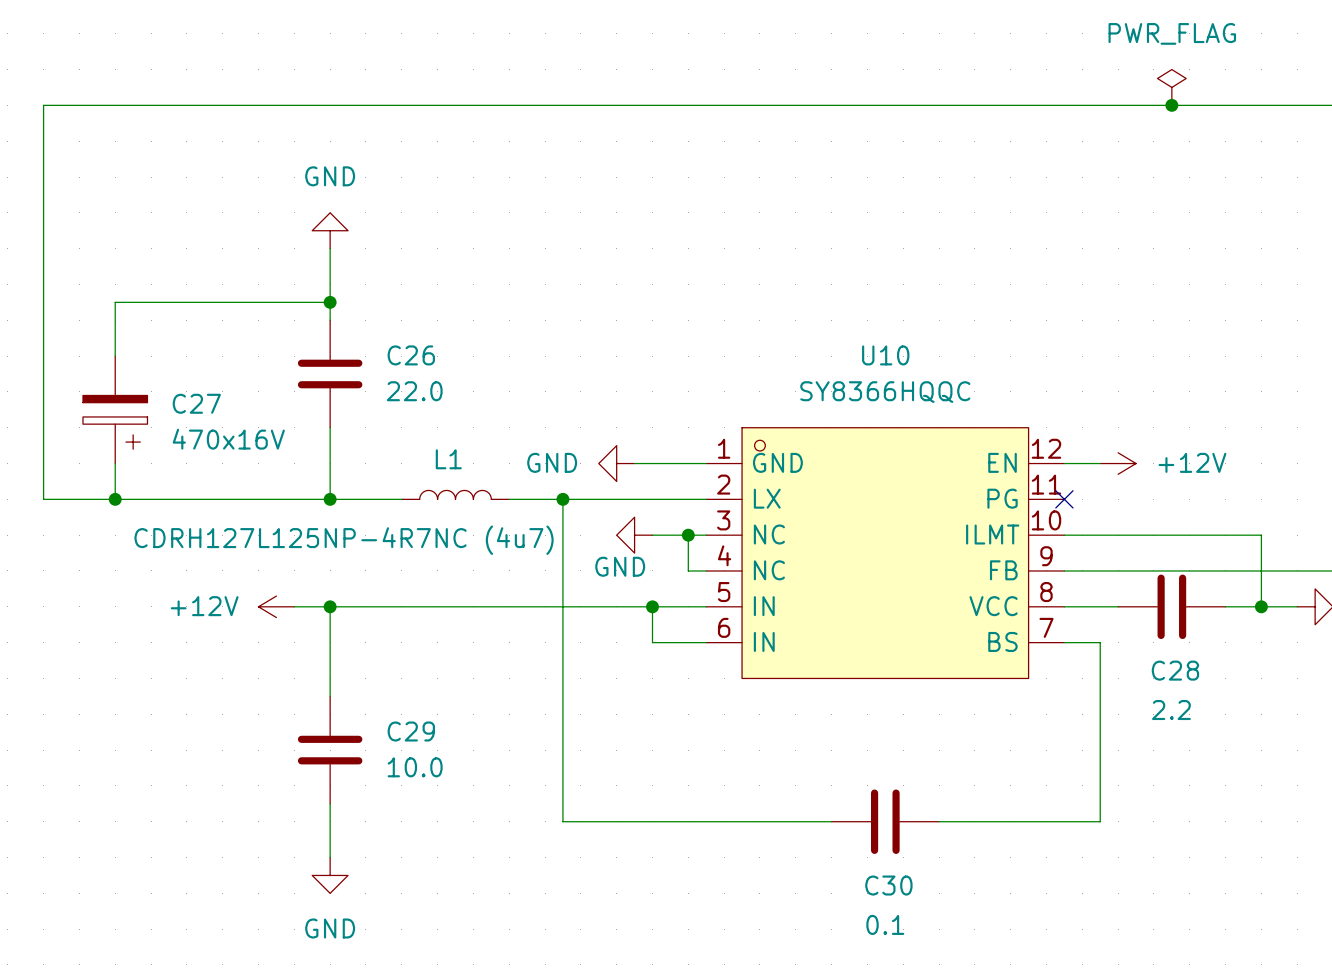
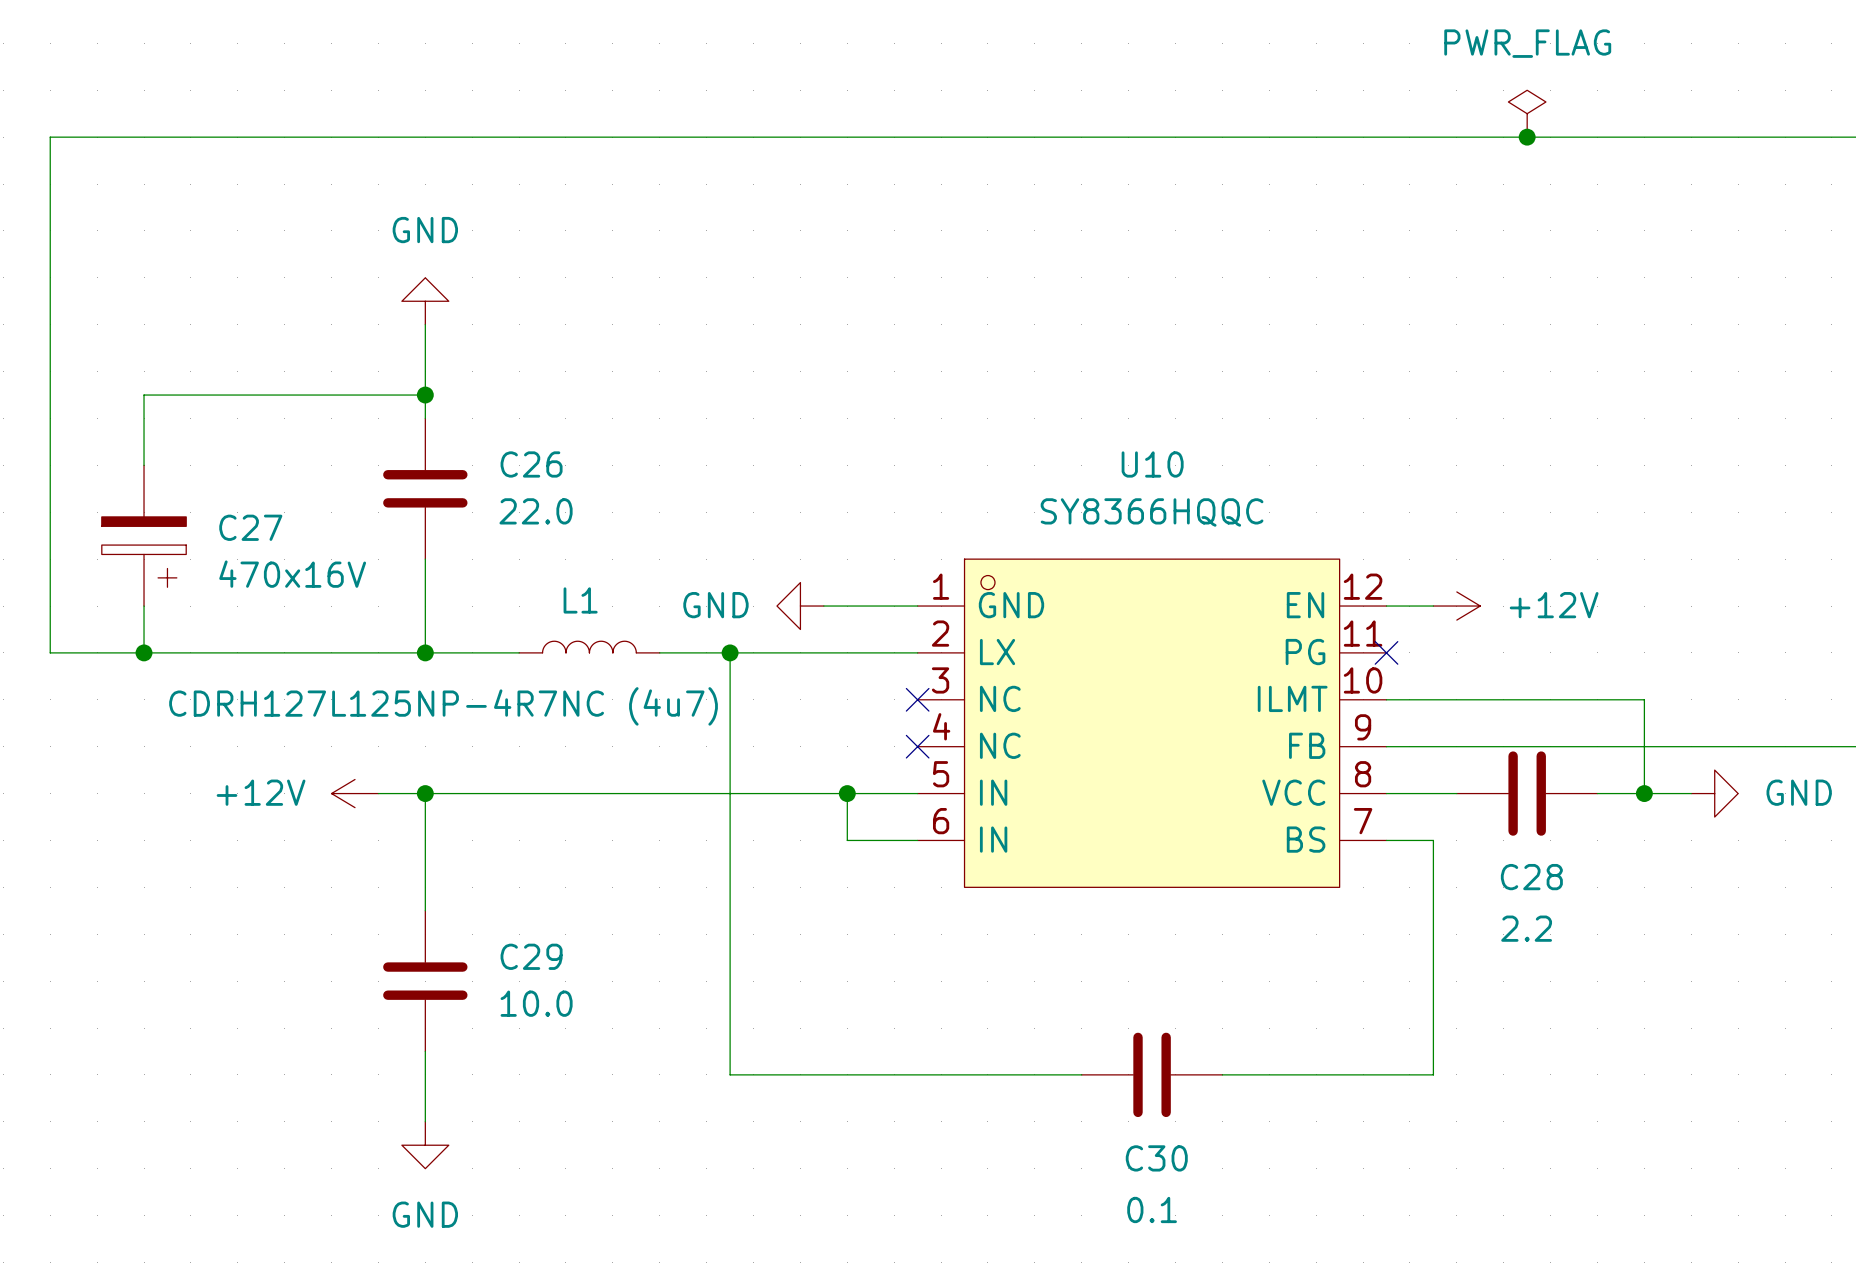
power symbol: GND (634, 535) -> none
wire: (652, 535) (706, 535) -> none
wire: (688, 535) (688, 570) (706, 570) -> none
junction: (688, 535) -> none
no-connect mark: none -> (917, 699)
no-connect mark: none -> (917, 746)

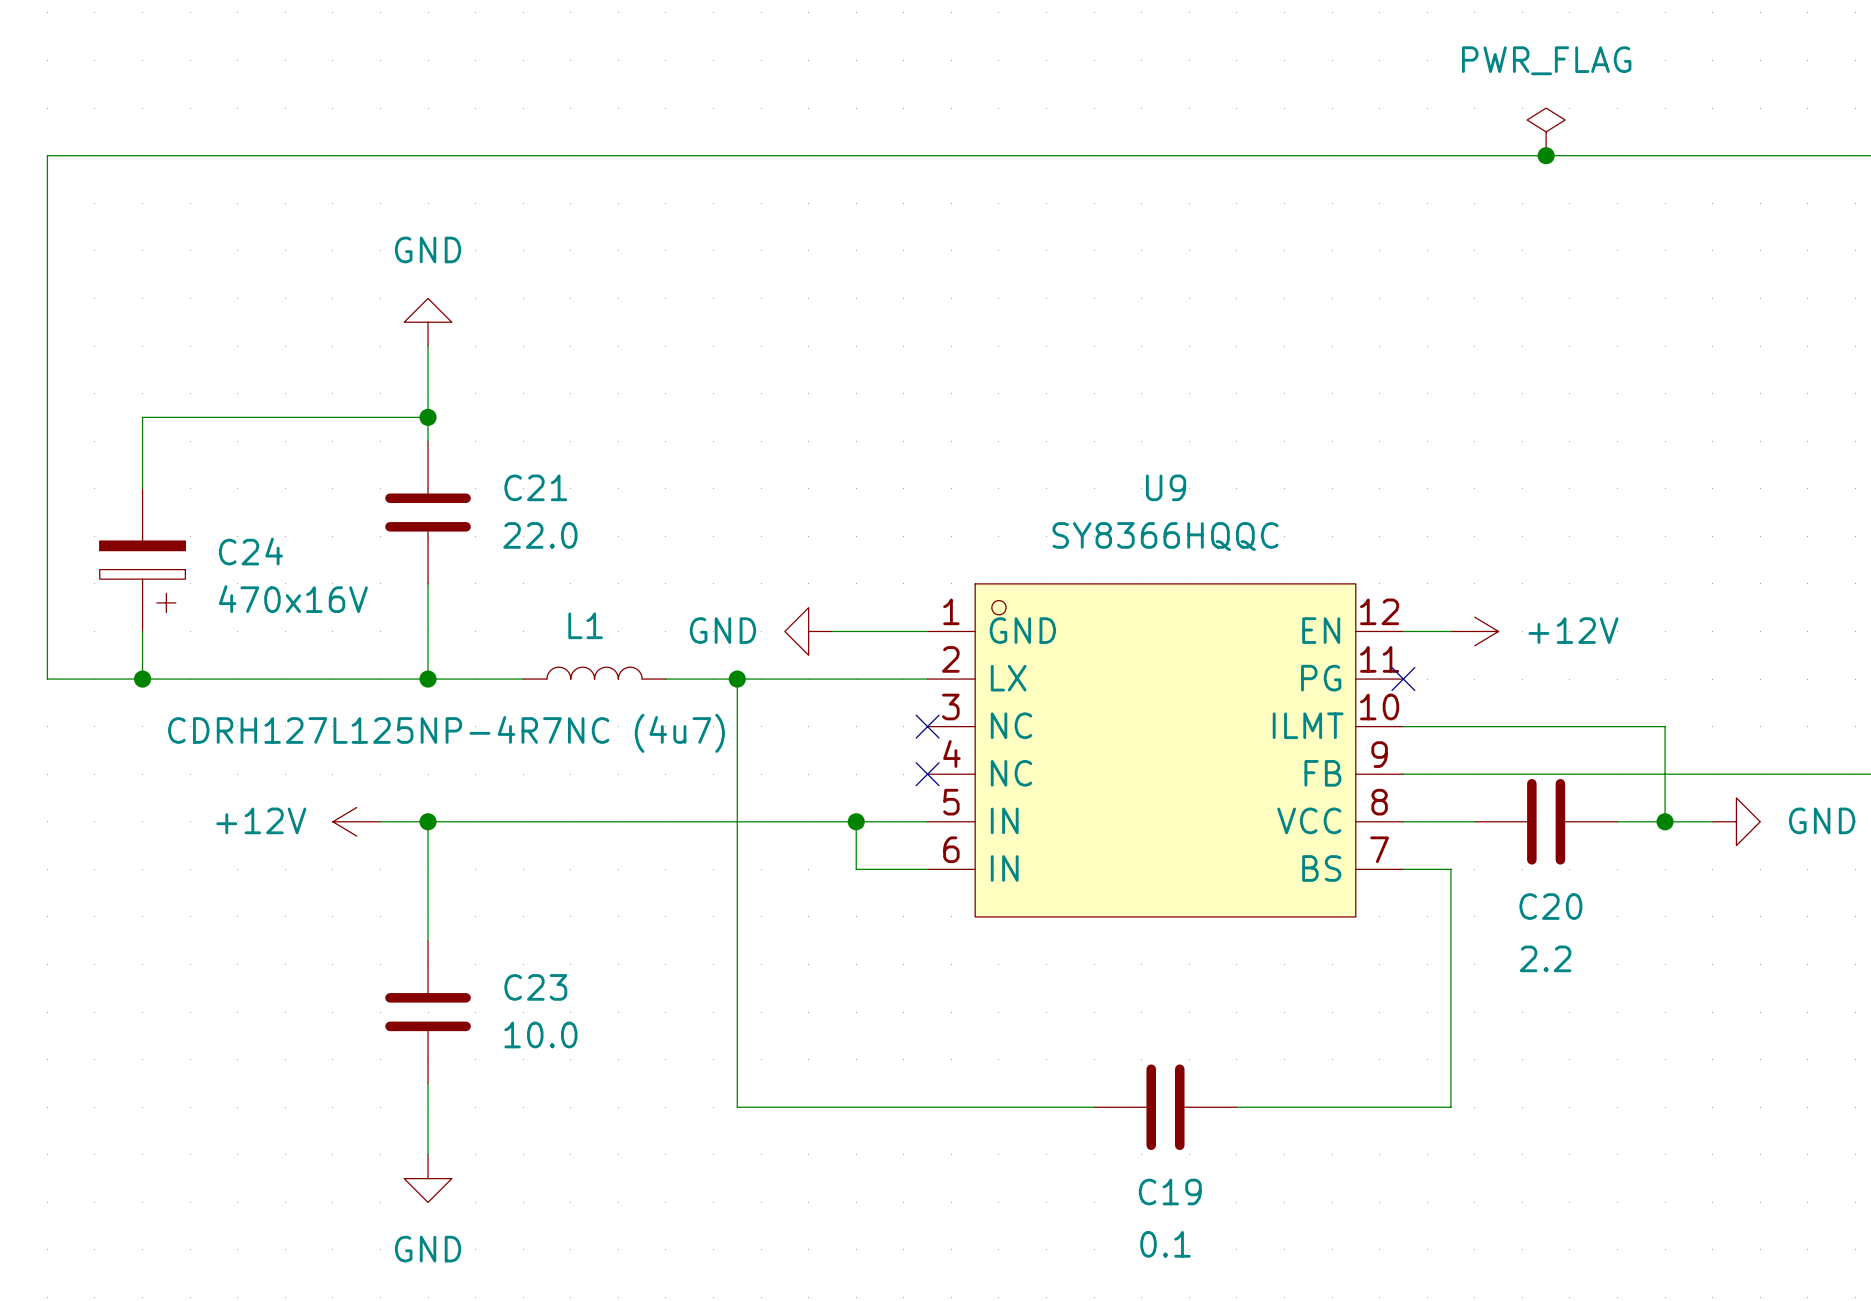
C26 name: C26 (531, 464) -> C21 (535, 487)
U10 name: U10 (1152, 464) -> U9 (1166, 487)
C27 name: C27 (250, 527) -> C24 (250, 551)
C28 name: C28 (1531, 877) -> C20 (1550, 906)
C29 name: C29 (531, 956) -> C23 (535, 987)
C30 name: C30 (1156, 1158) -> C19 (1170, 1192)

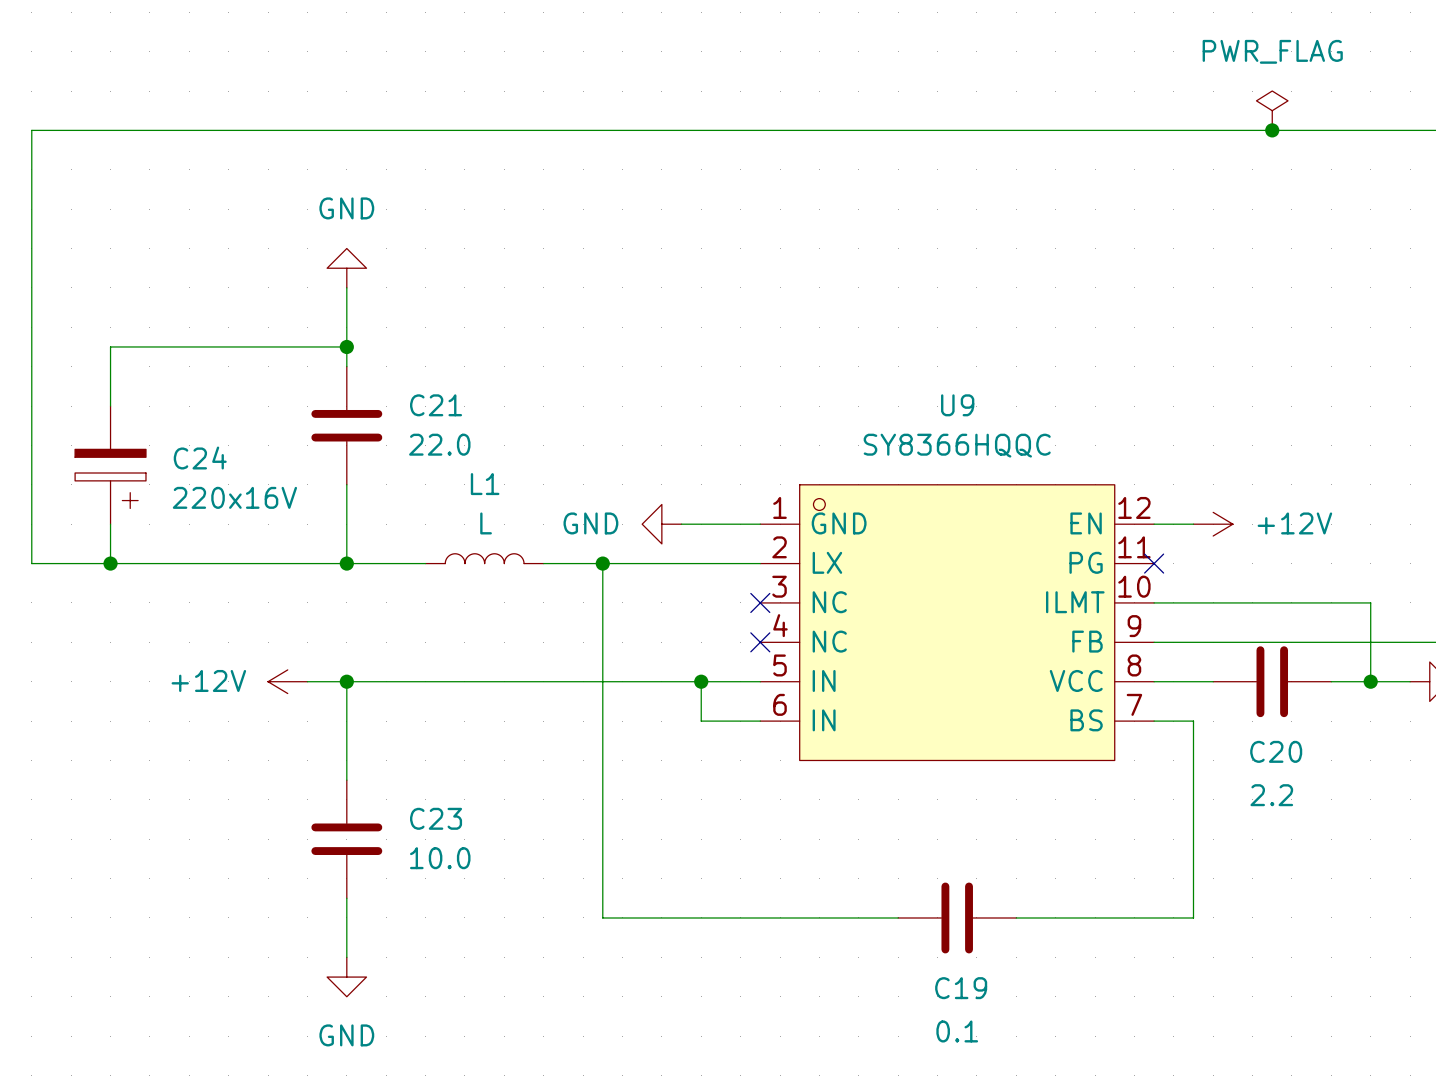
C24 value: 470x16V (293, 599) -> 220x16V (234, 497)
L1 name position: L1 (585, 625) -> L1 (485, 484)
L1 value: CDRH127L125NP-4R7NC (4u7) (446, 733) -> L (486, 523)

